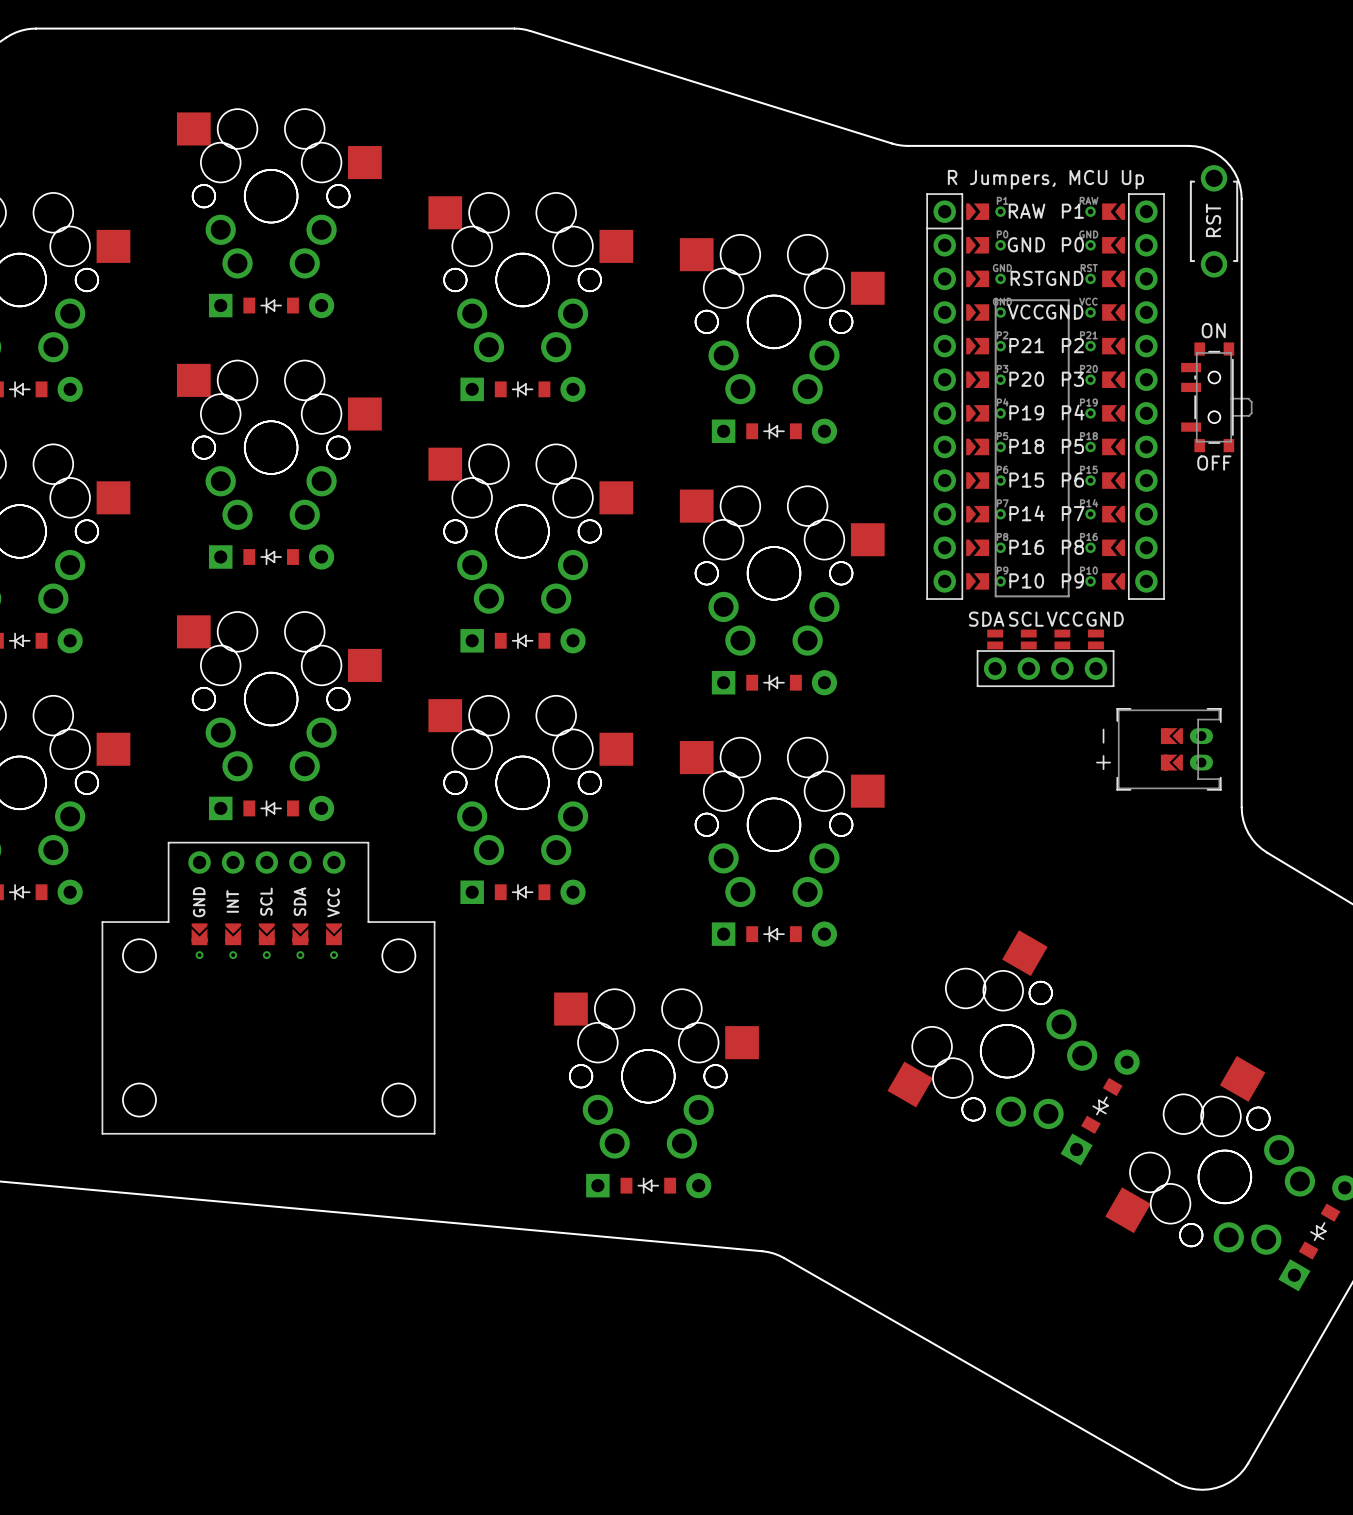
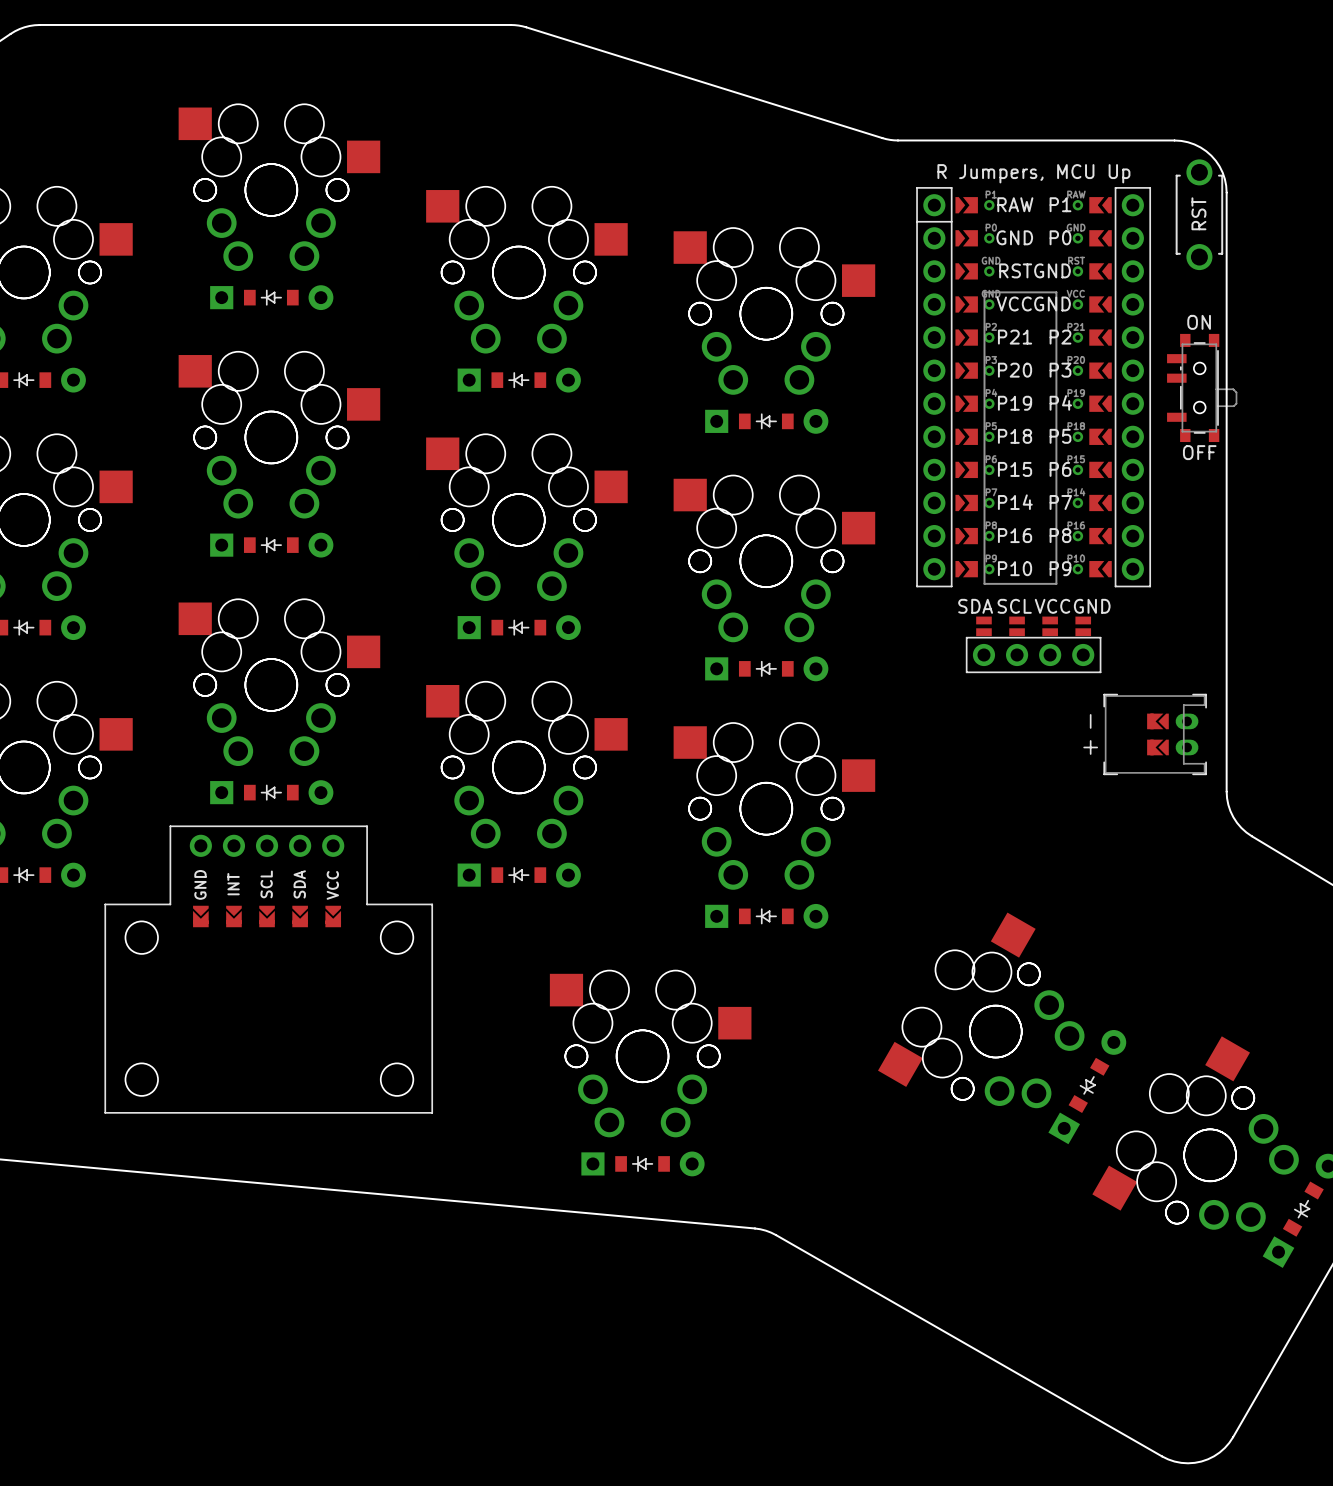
part footprint: [101, 841, 436, 1135] -> [104, 825, 433, 1114]

